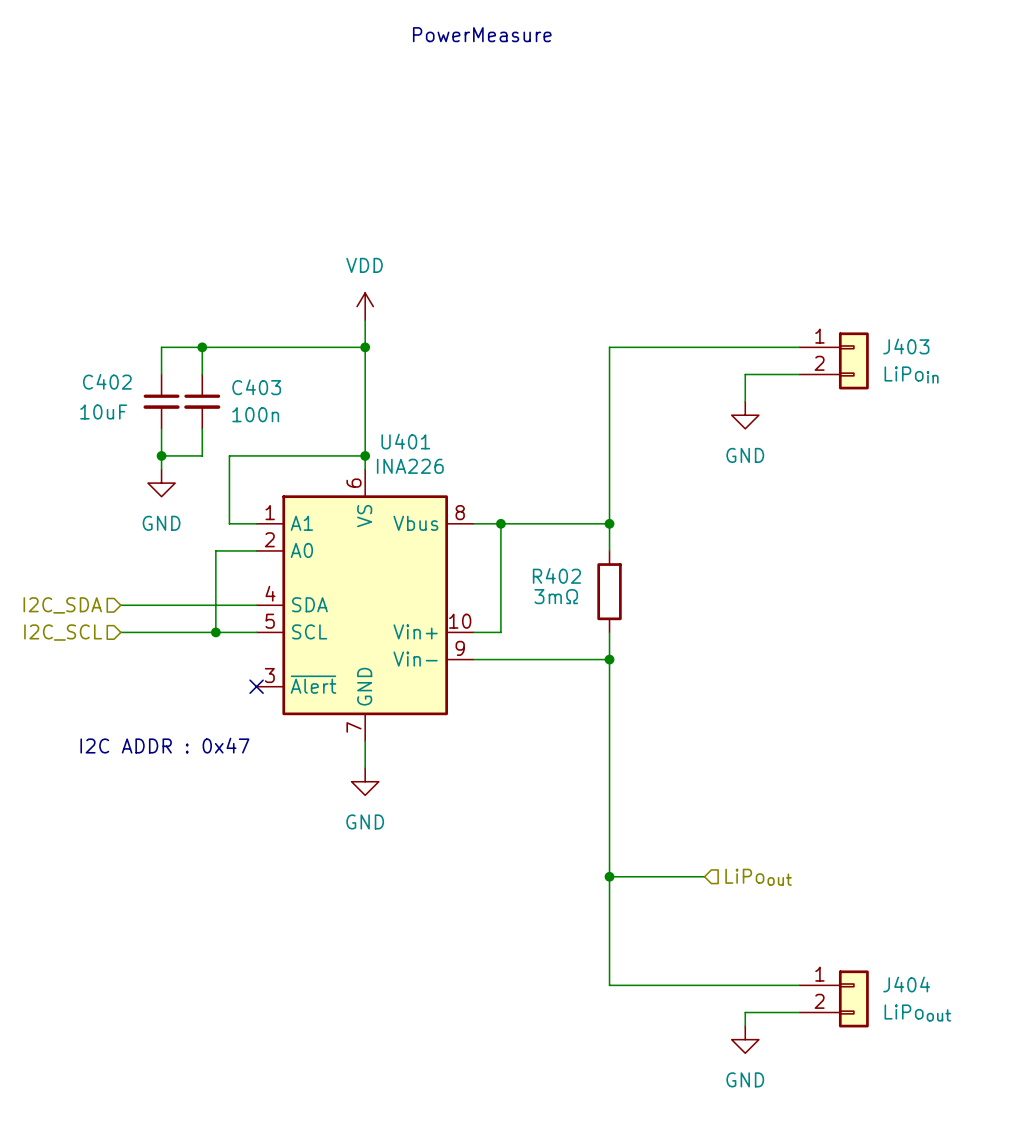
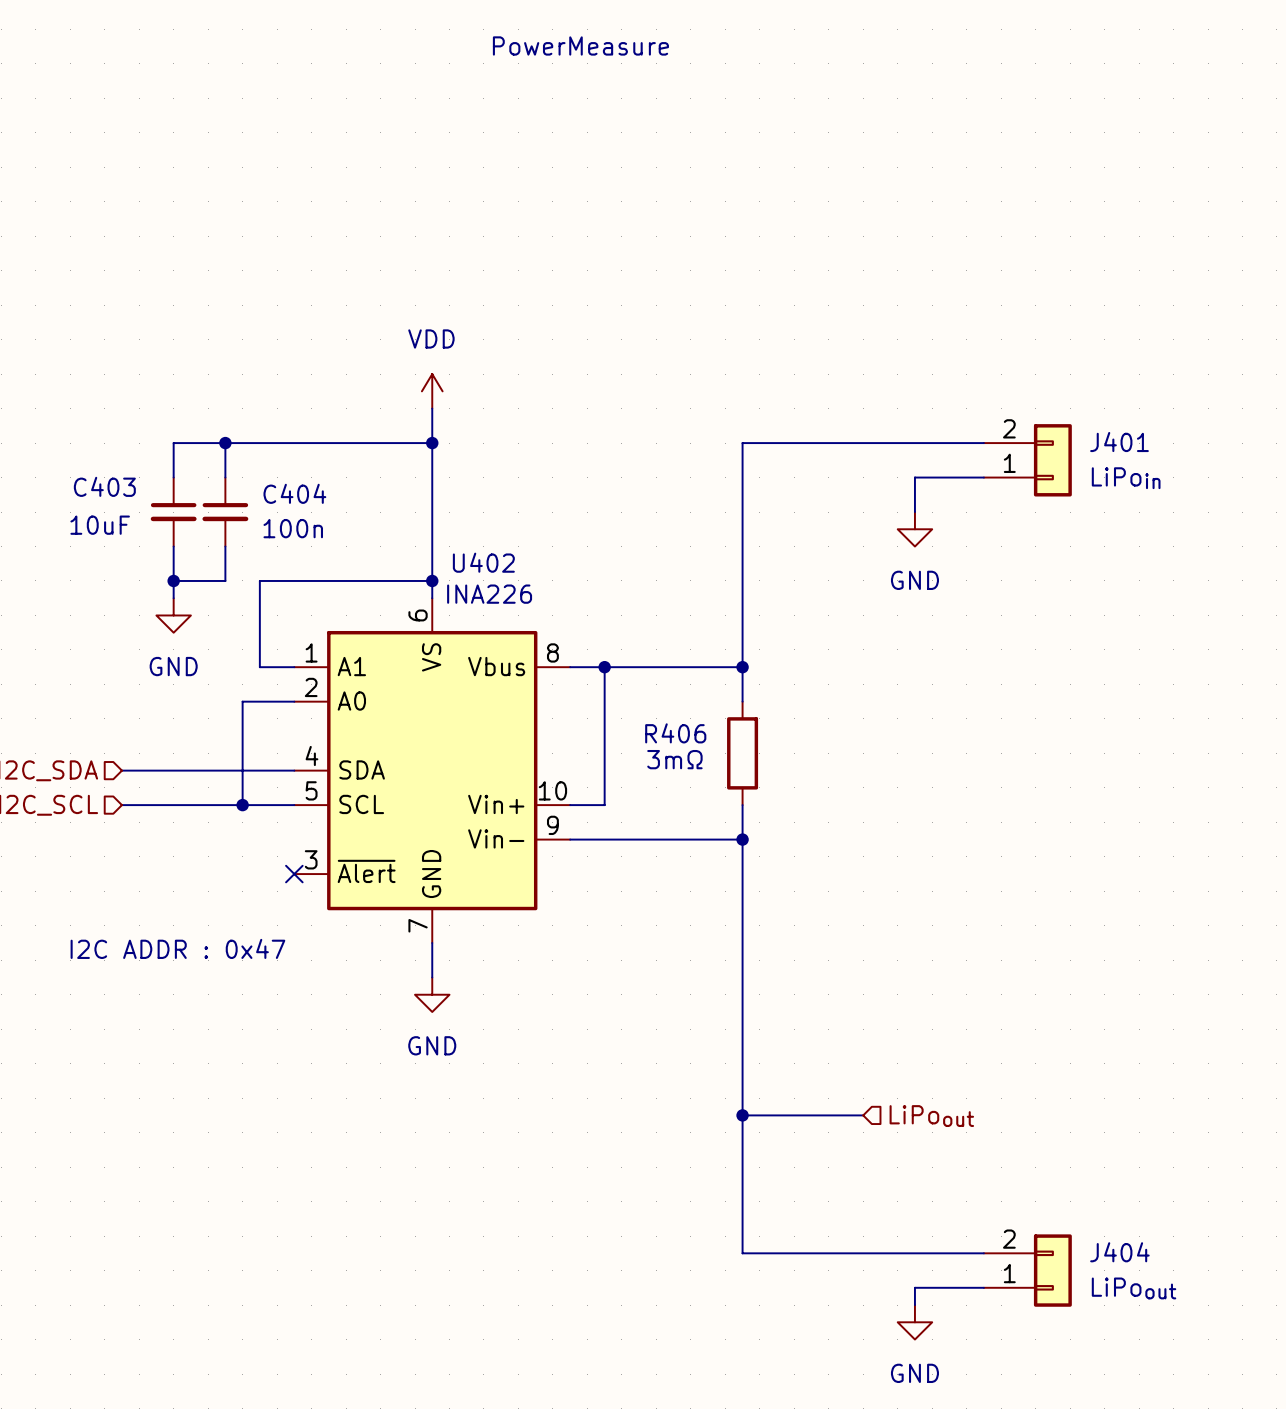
J403 name: J403 (906, 346) -> J401 (1119, 442)
J403 flip: as is (853, 360) -> up-down (1052, 460)
C402 name: C402 (107, 381) -> C403 (104, 486)
C403 name: C403 (256, 387) -> C404 (294, 493)
U401 name: U401 (405, 441) -> U402 (483, 562)
R402 name: R402 (556, 575) -> R406 (675, 733)
J404 flip: as is (853, 998) -> up-down (1052, 1270)

